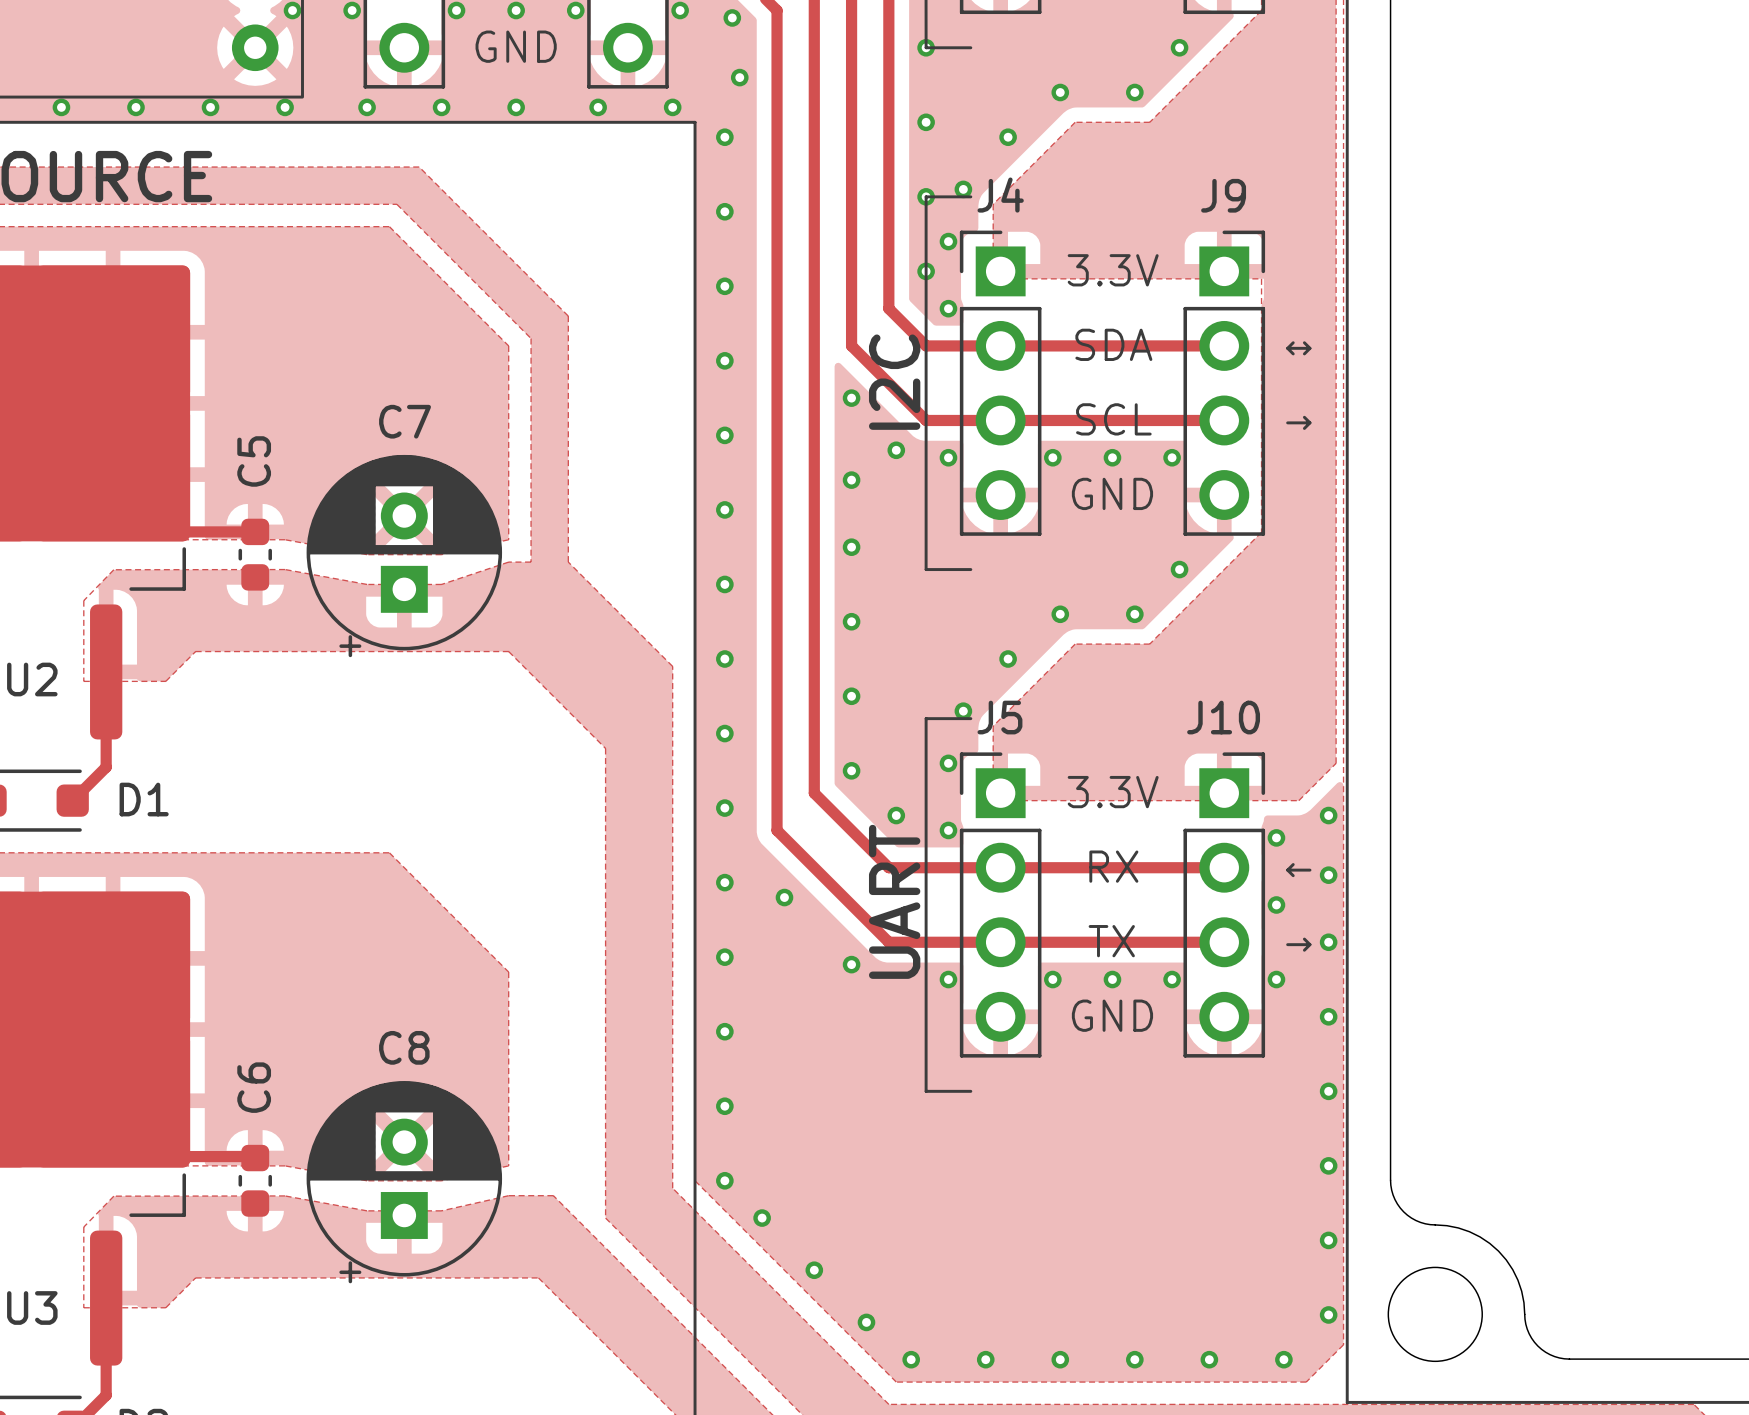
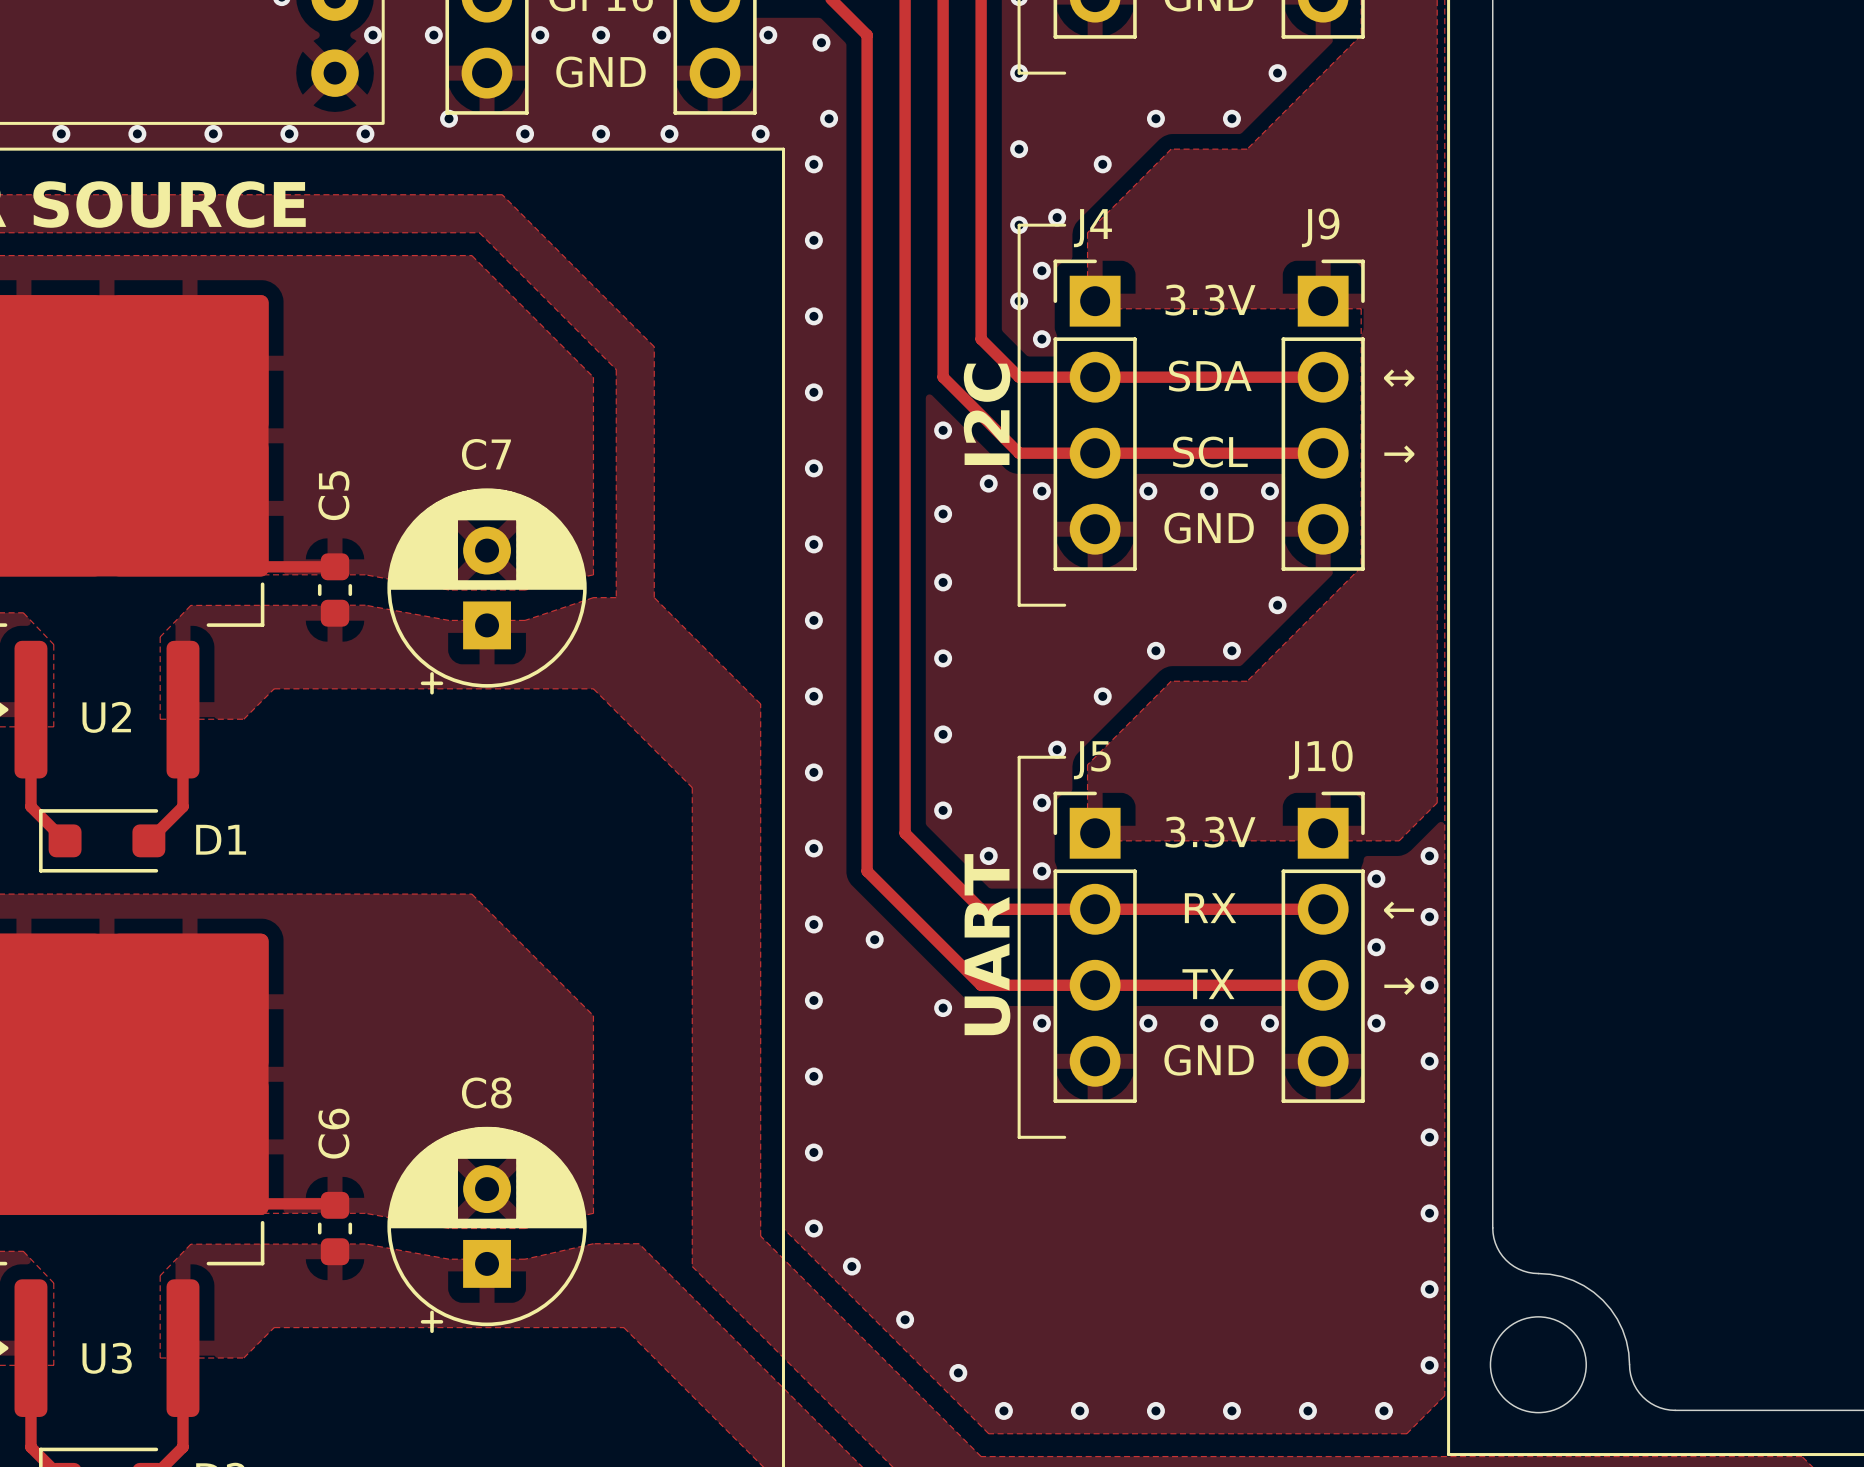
via position: (739, 77) -> (829, 118)
via position: (367, 107) -> (449, 118)
via position: (598, 107) -> (669, 133)

